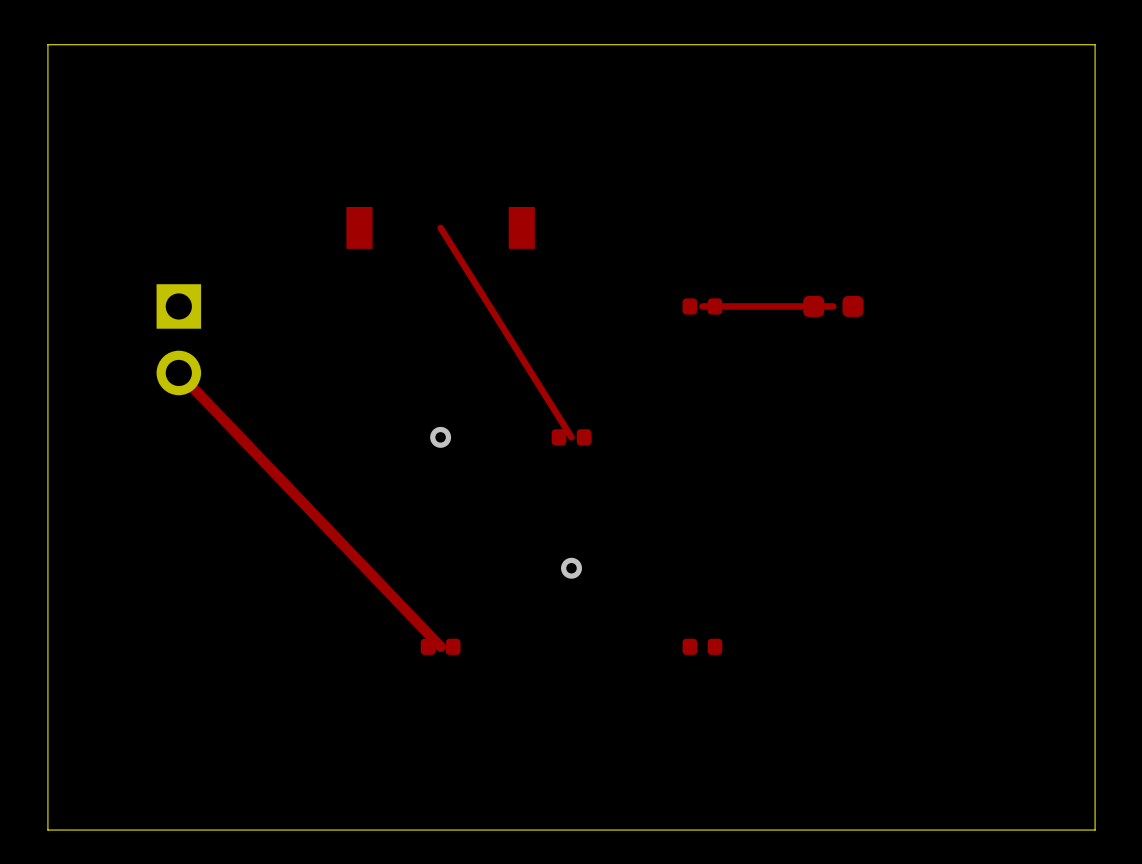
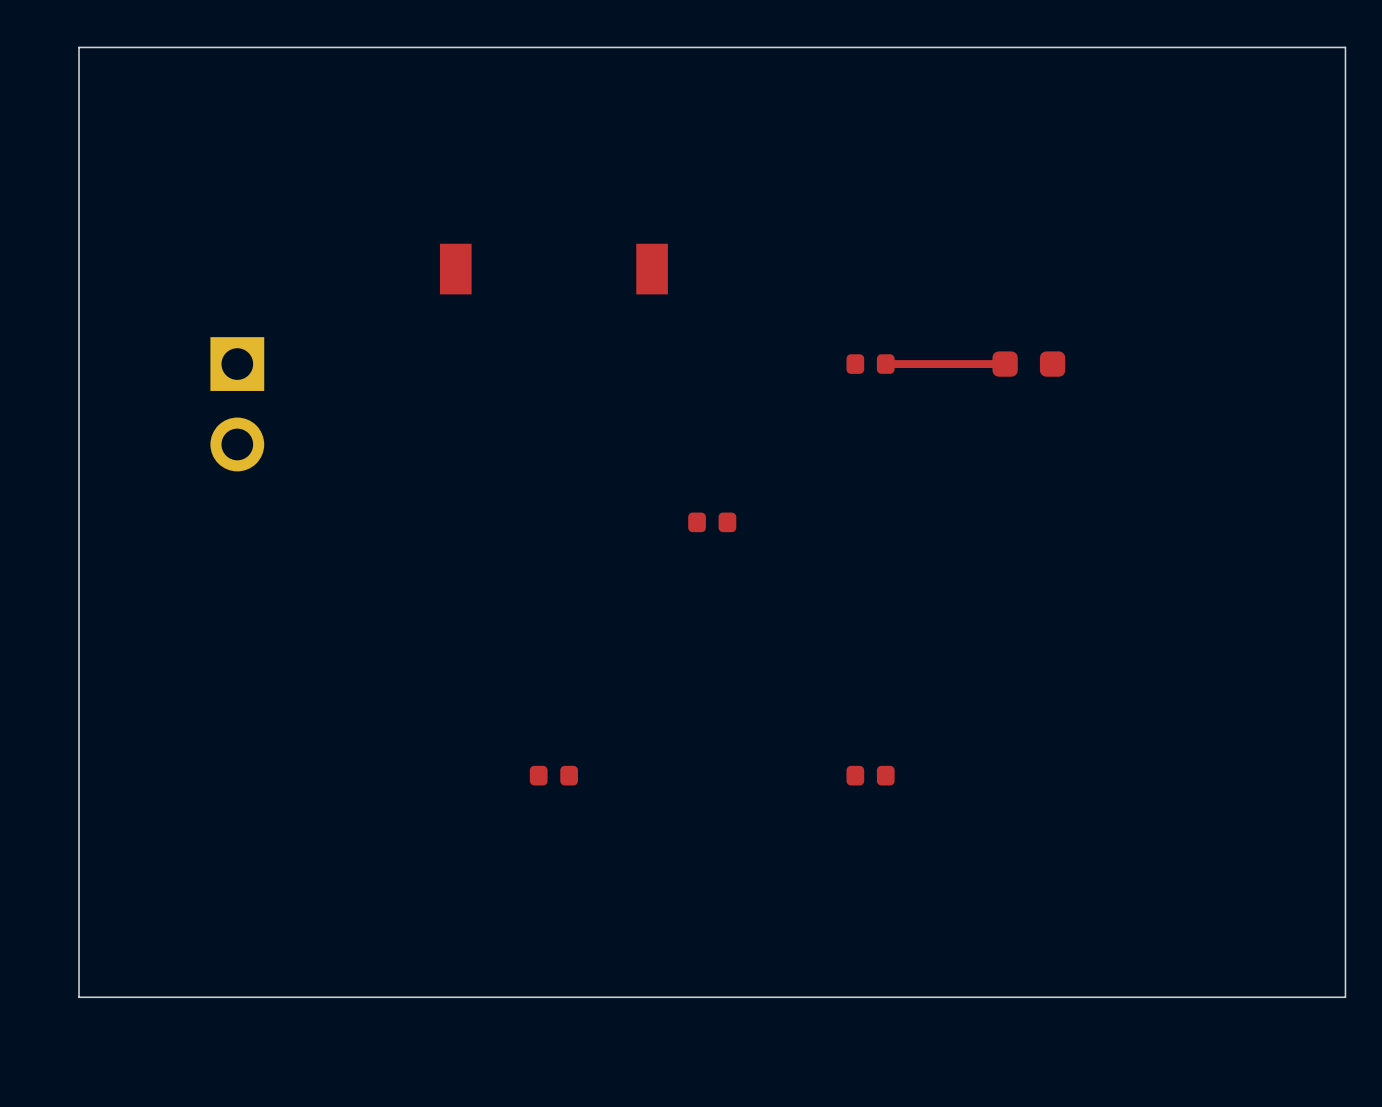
top track: (440, 227) (571, 437) -> none
top track: (702, 306) (714, 306) -> none
top track: (813, 306) (833, 306) -> none
top track: (178, 372) (440, 646) -> none
via: (440, 437) -> none
via: (571, 568) -> none

